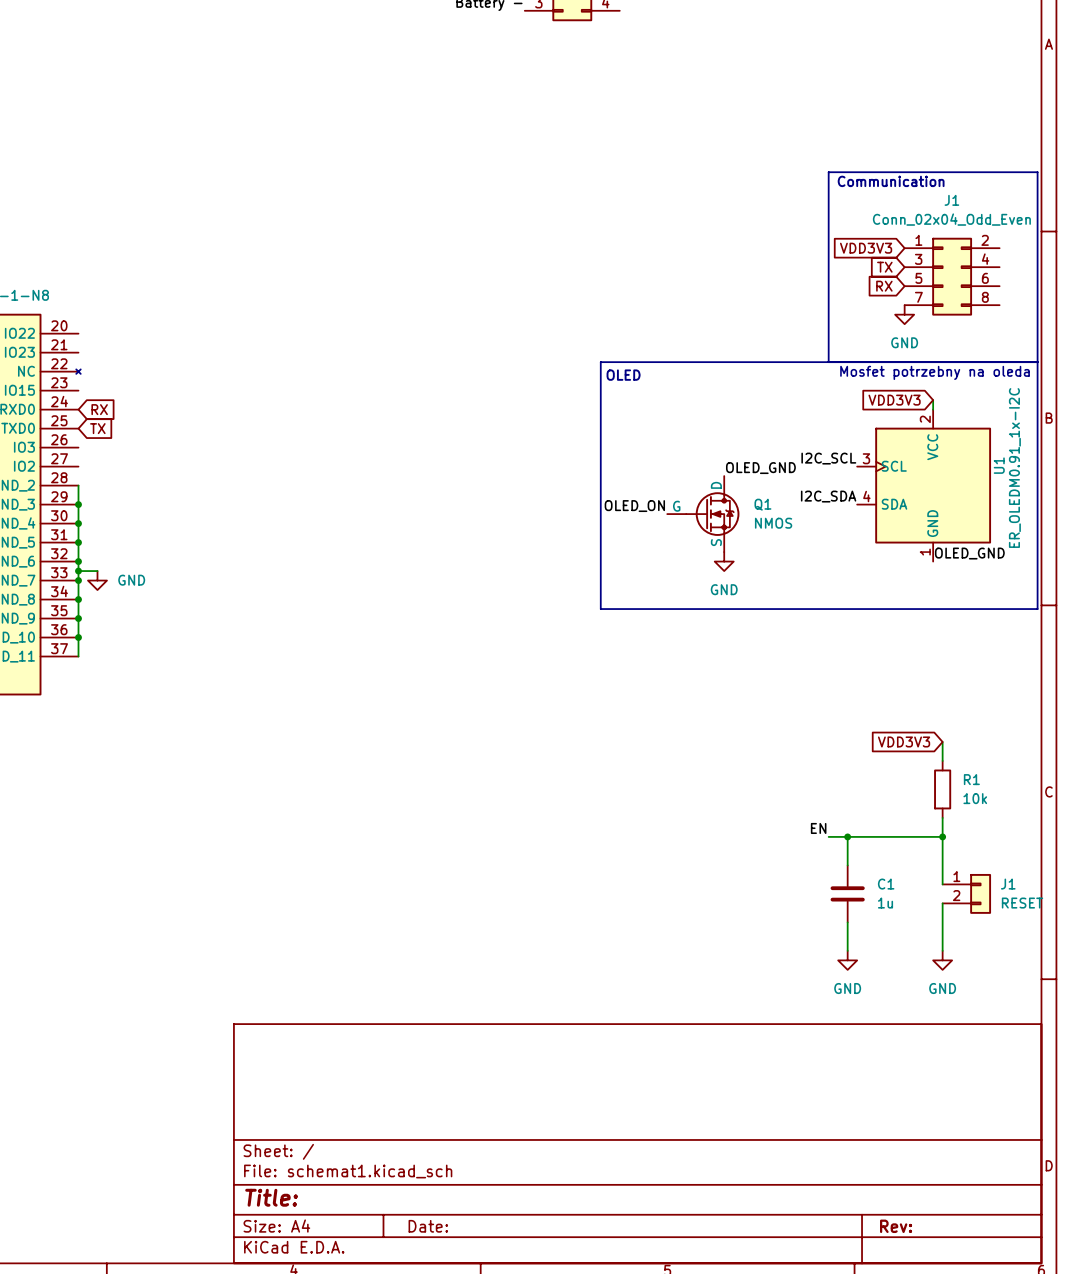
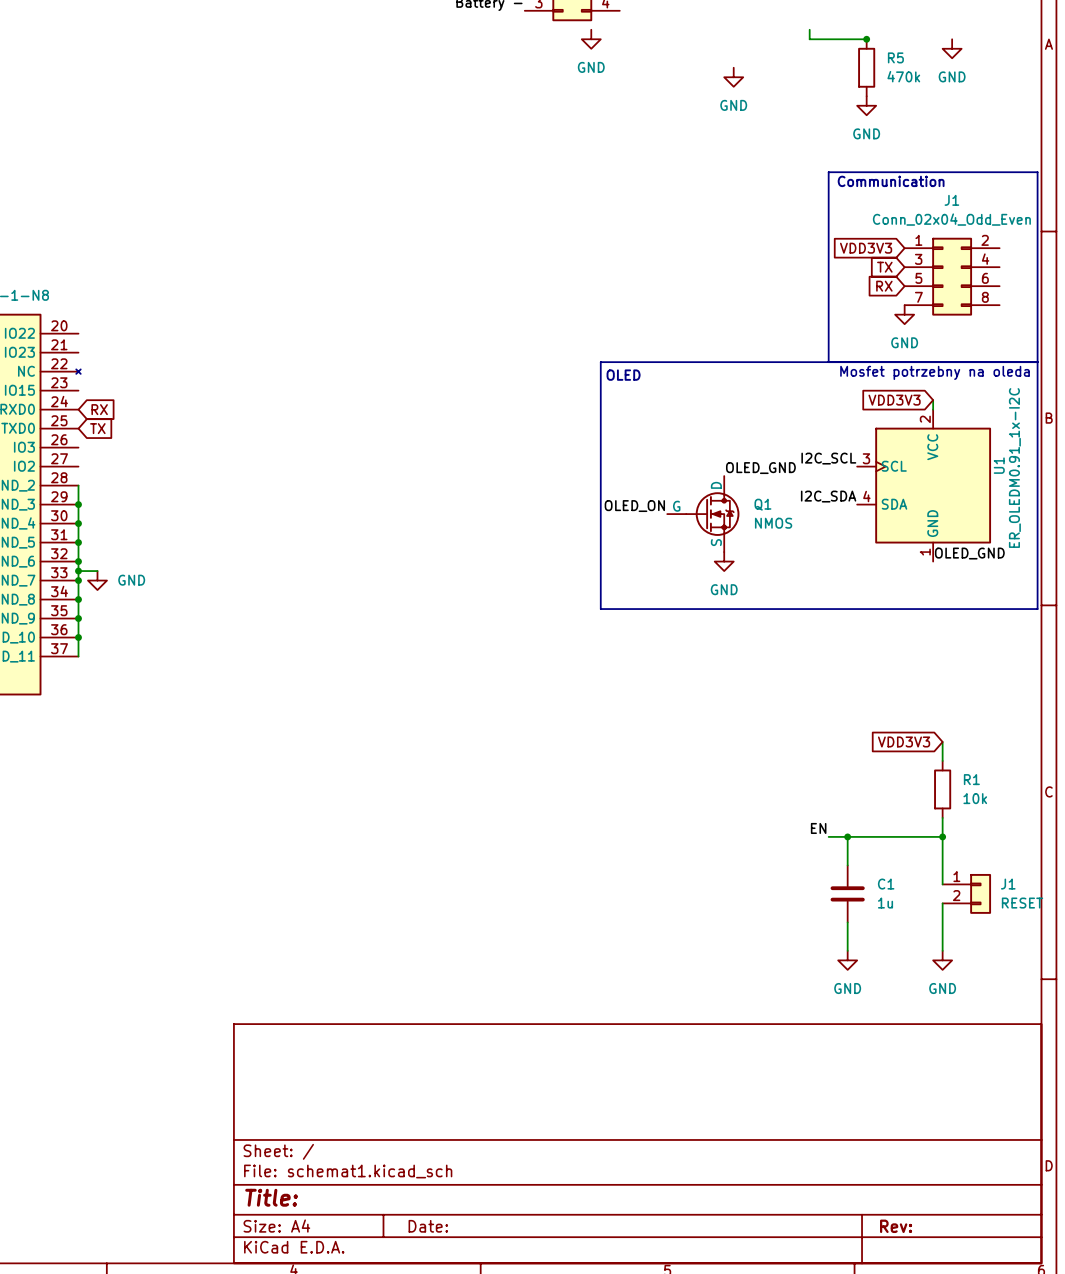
wire: none -> (809, 29) (809, 39) (866, 39)
power symbol: none -> GND (591, 39)
junction: none -> (866, 39)
power symbol: none -> GND (952, 48)
R5: none -> 470k (866, 67)
power symbol: none -> GND (733, 77)
power symbol: none -> GND (866, 105)

